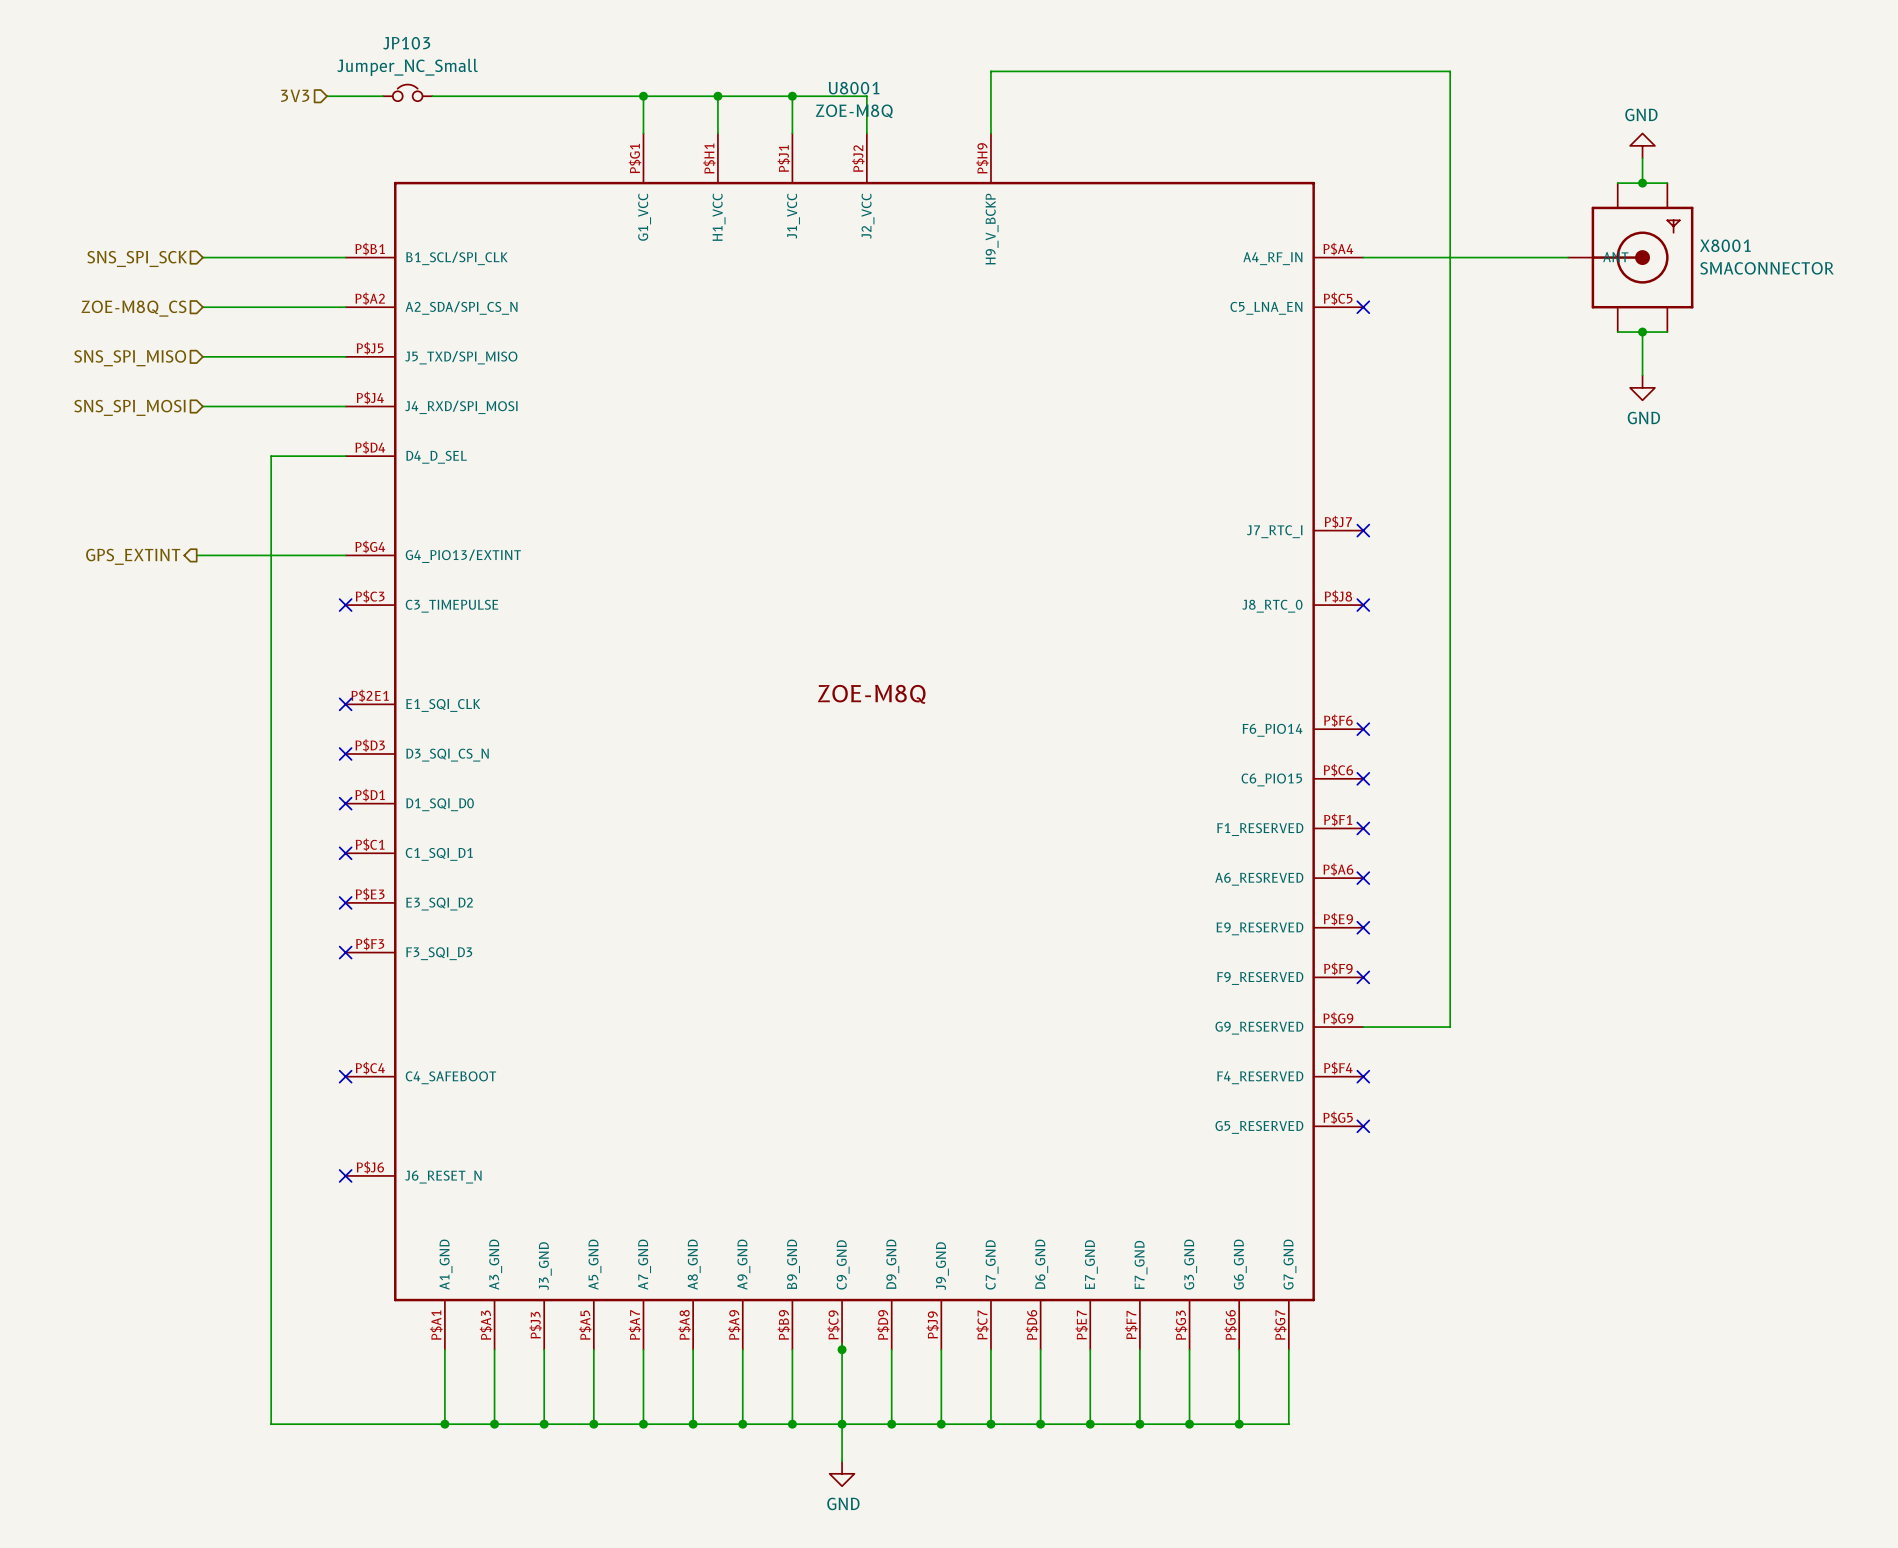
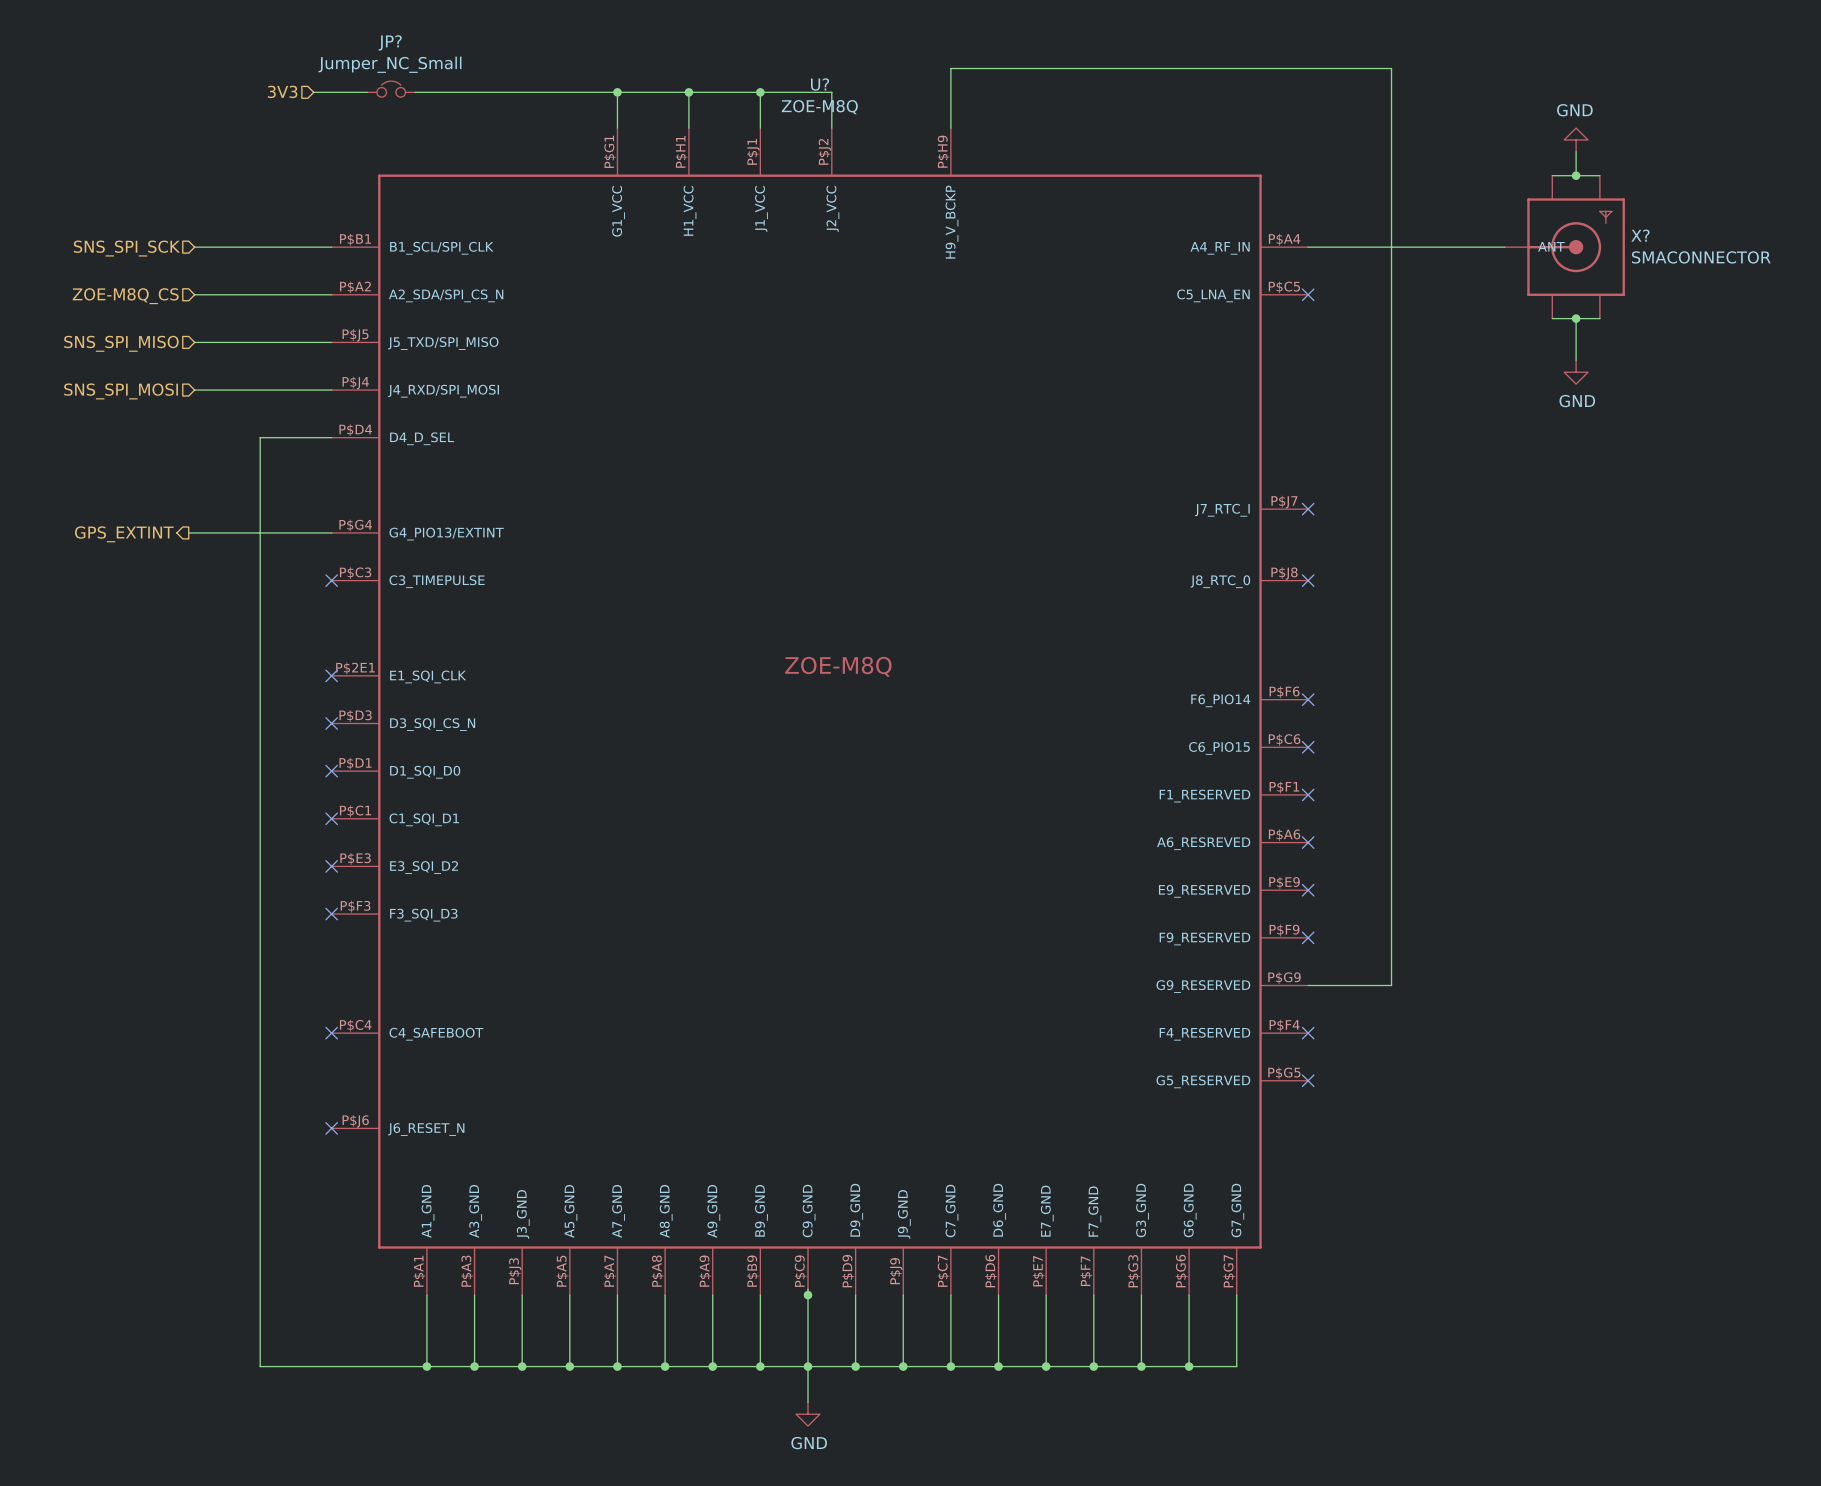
JP103 name: JP103 (406, 43) -> JP? (390, 42)
U8001 name: U8001 (854, 88) -> U? (820, 84)
X8001 name: X8001 (1725, 245) -> X? (1640, 235)

